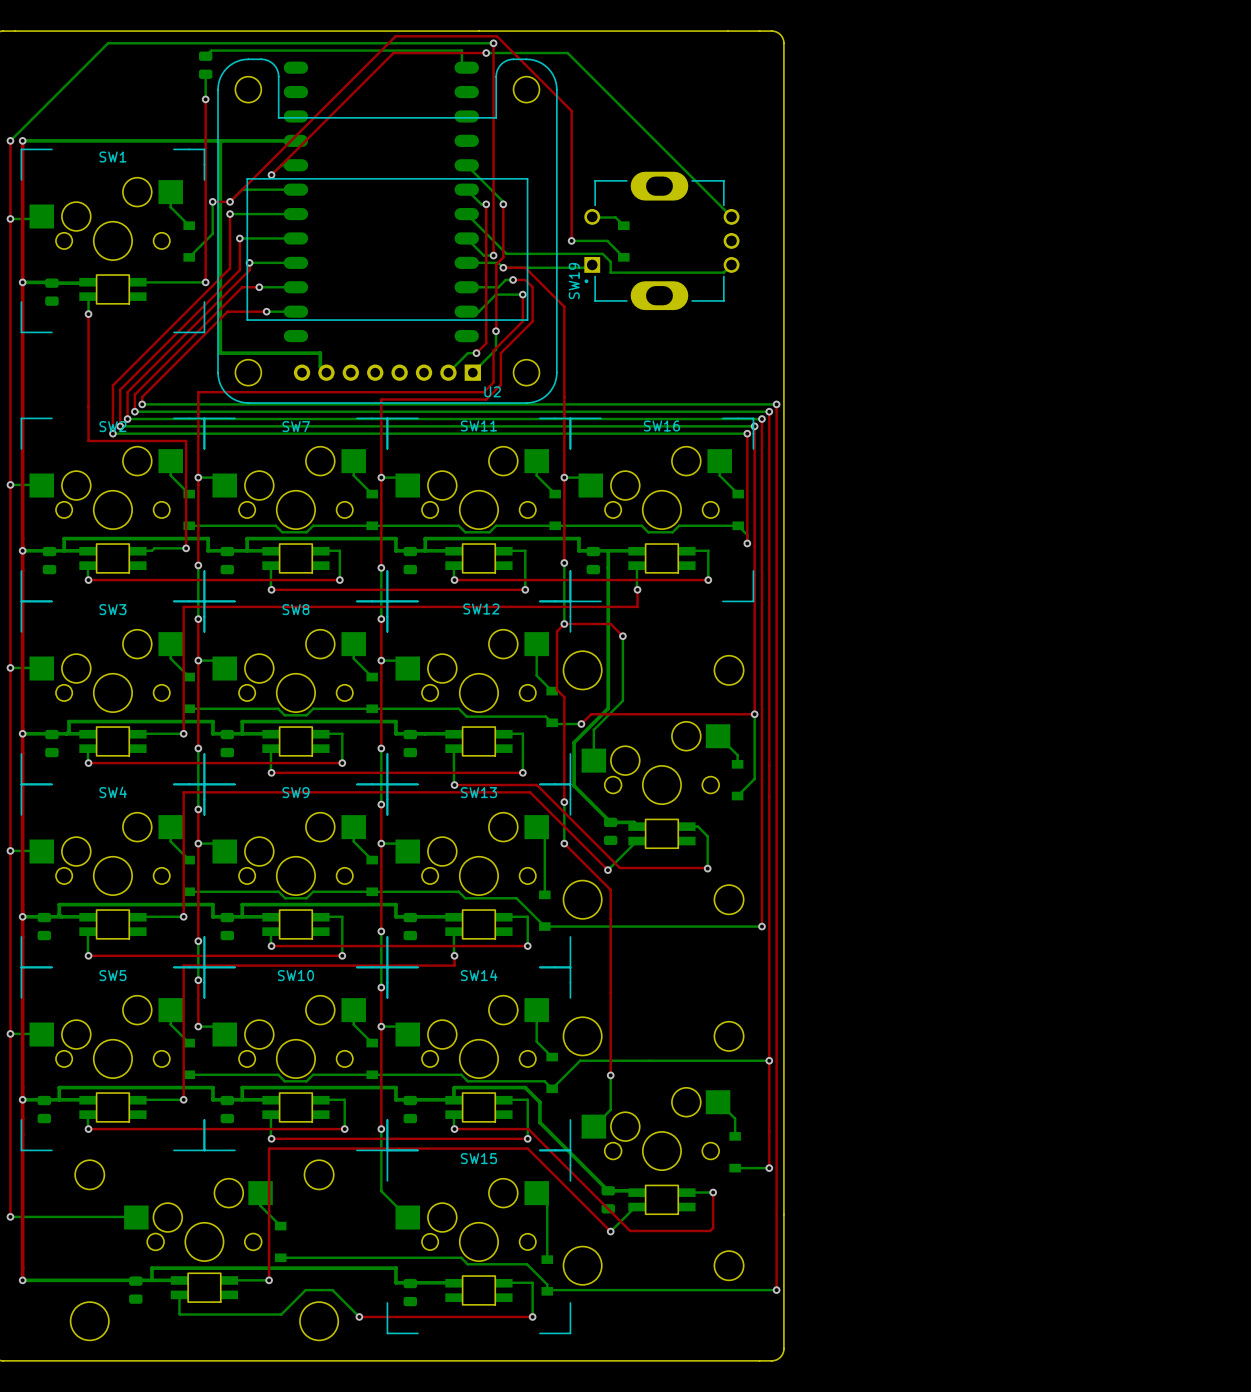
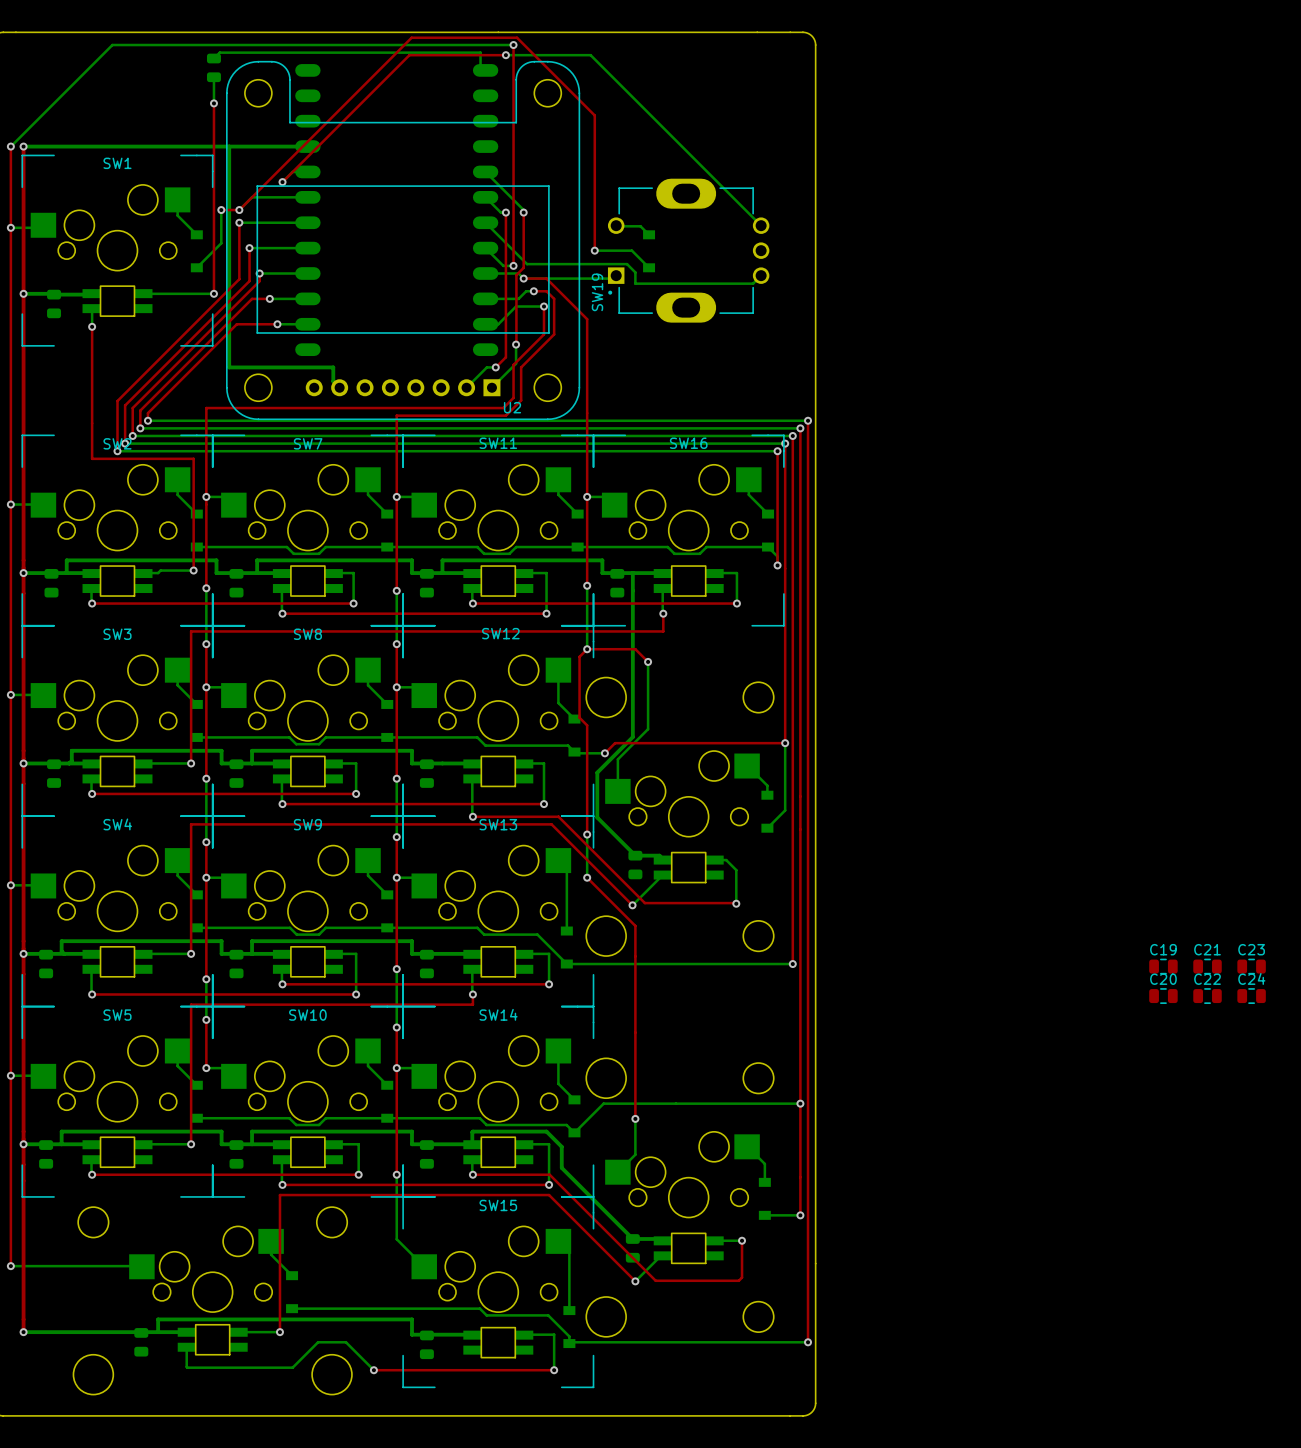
C19: none -> (1163, 966)
C21: none -> (1207, 966)
C23: none -> (1251, 966)
C20: none -> (1163, 996)
C22: none -> (1207, 996)
C24: none -> (1251, 996)

